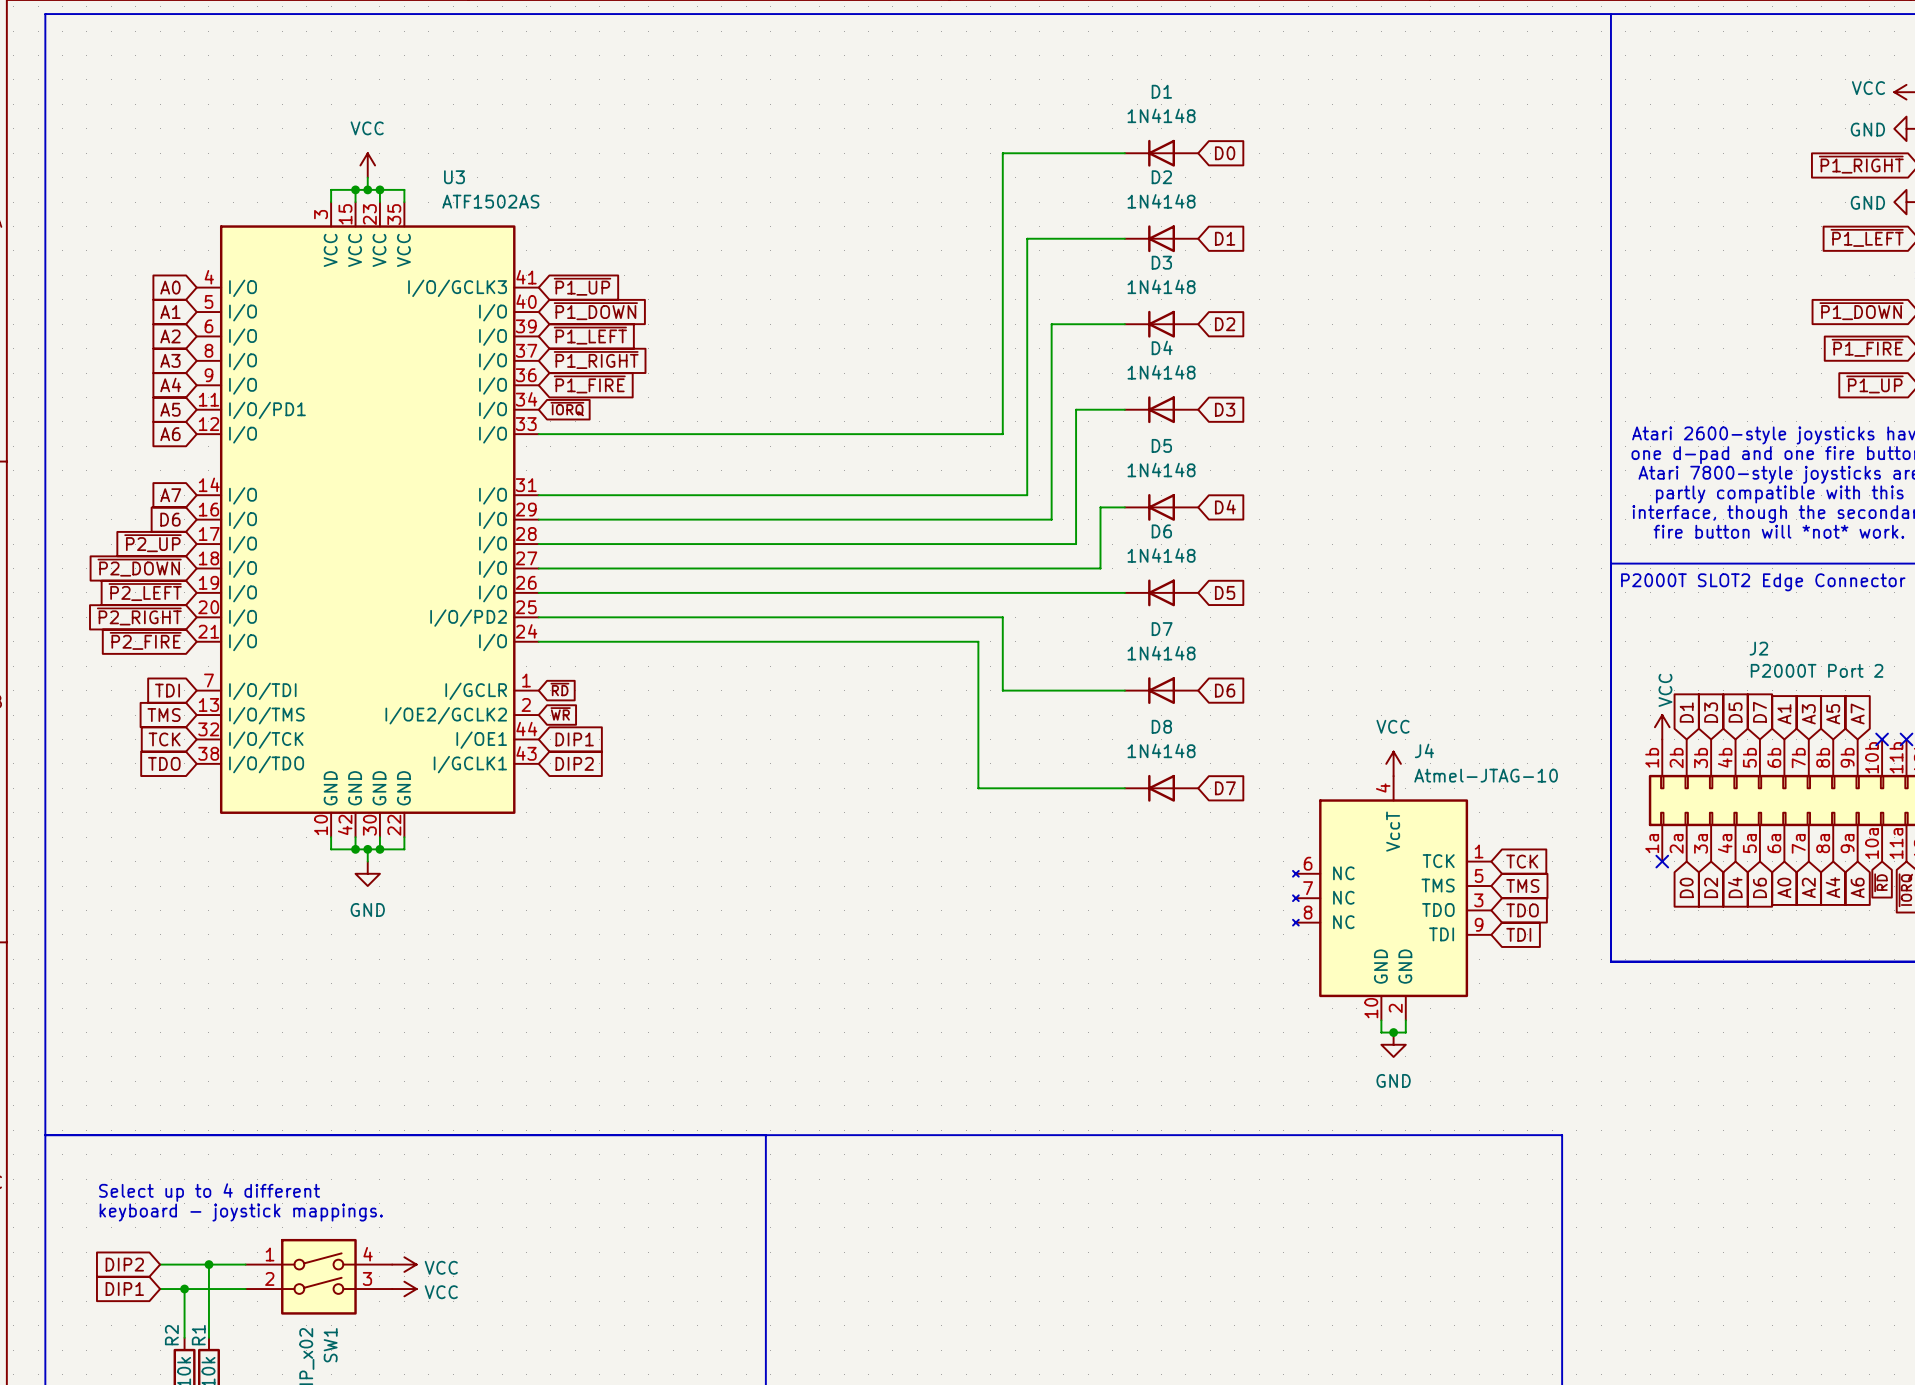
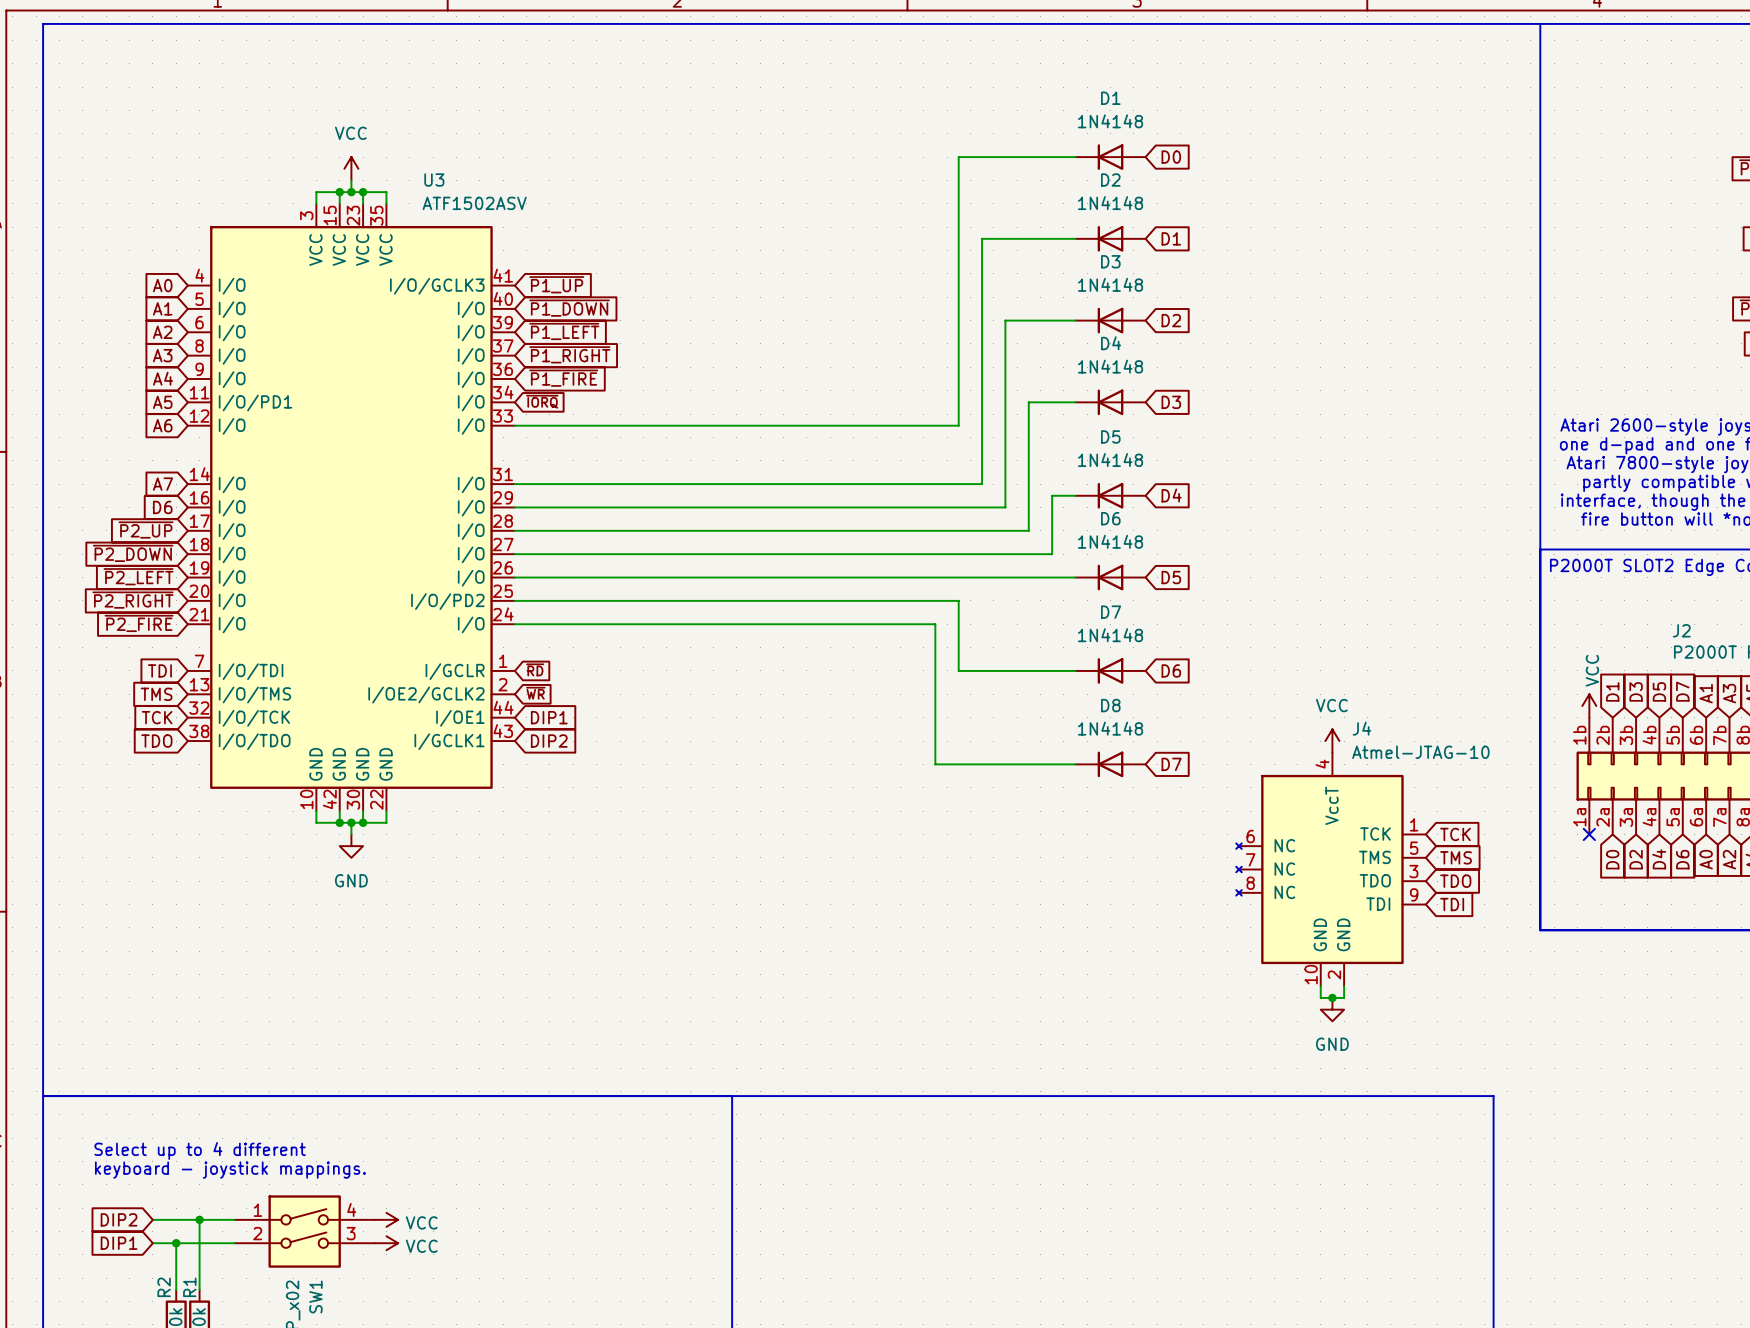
U3 value: ATF1502AS (490, 201) -> ATF1502ASV (474, 203)

